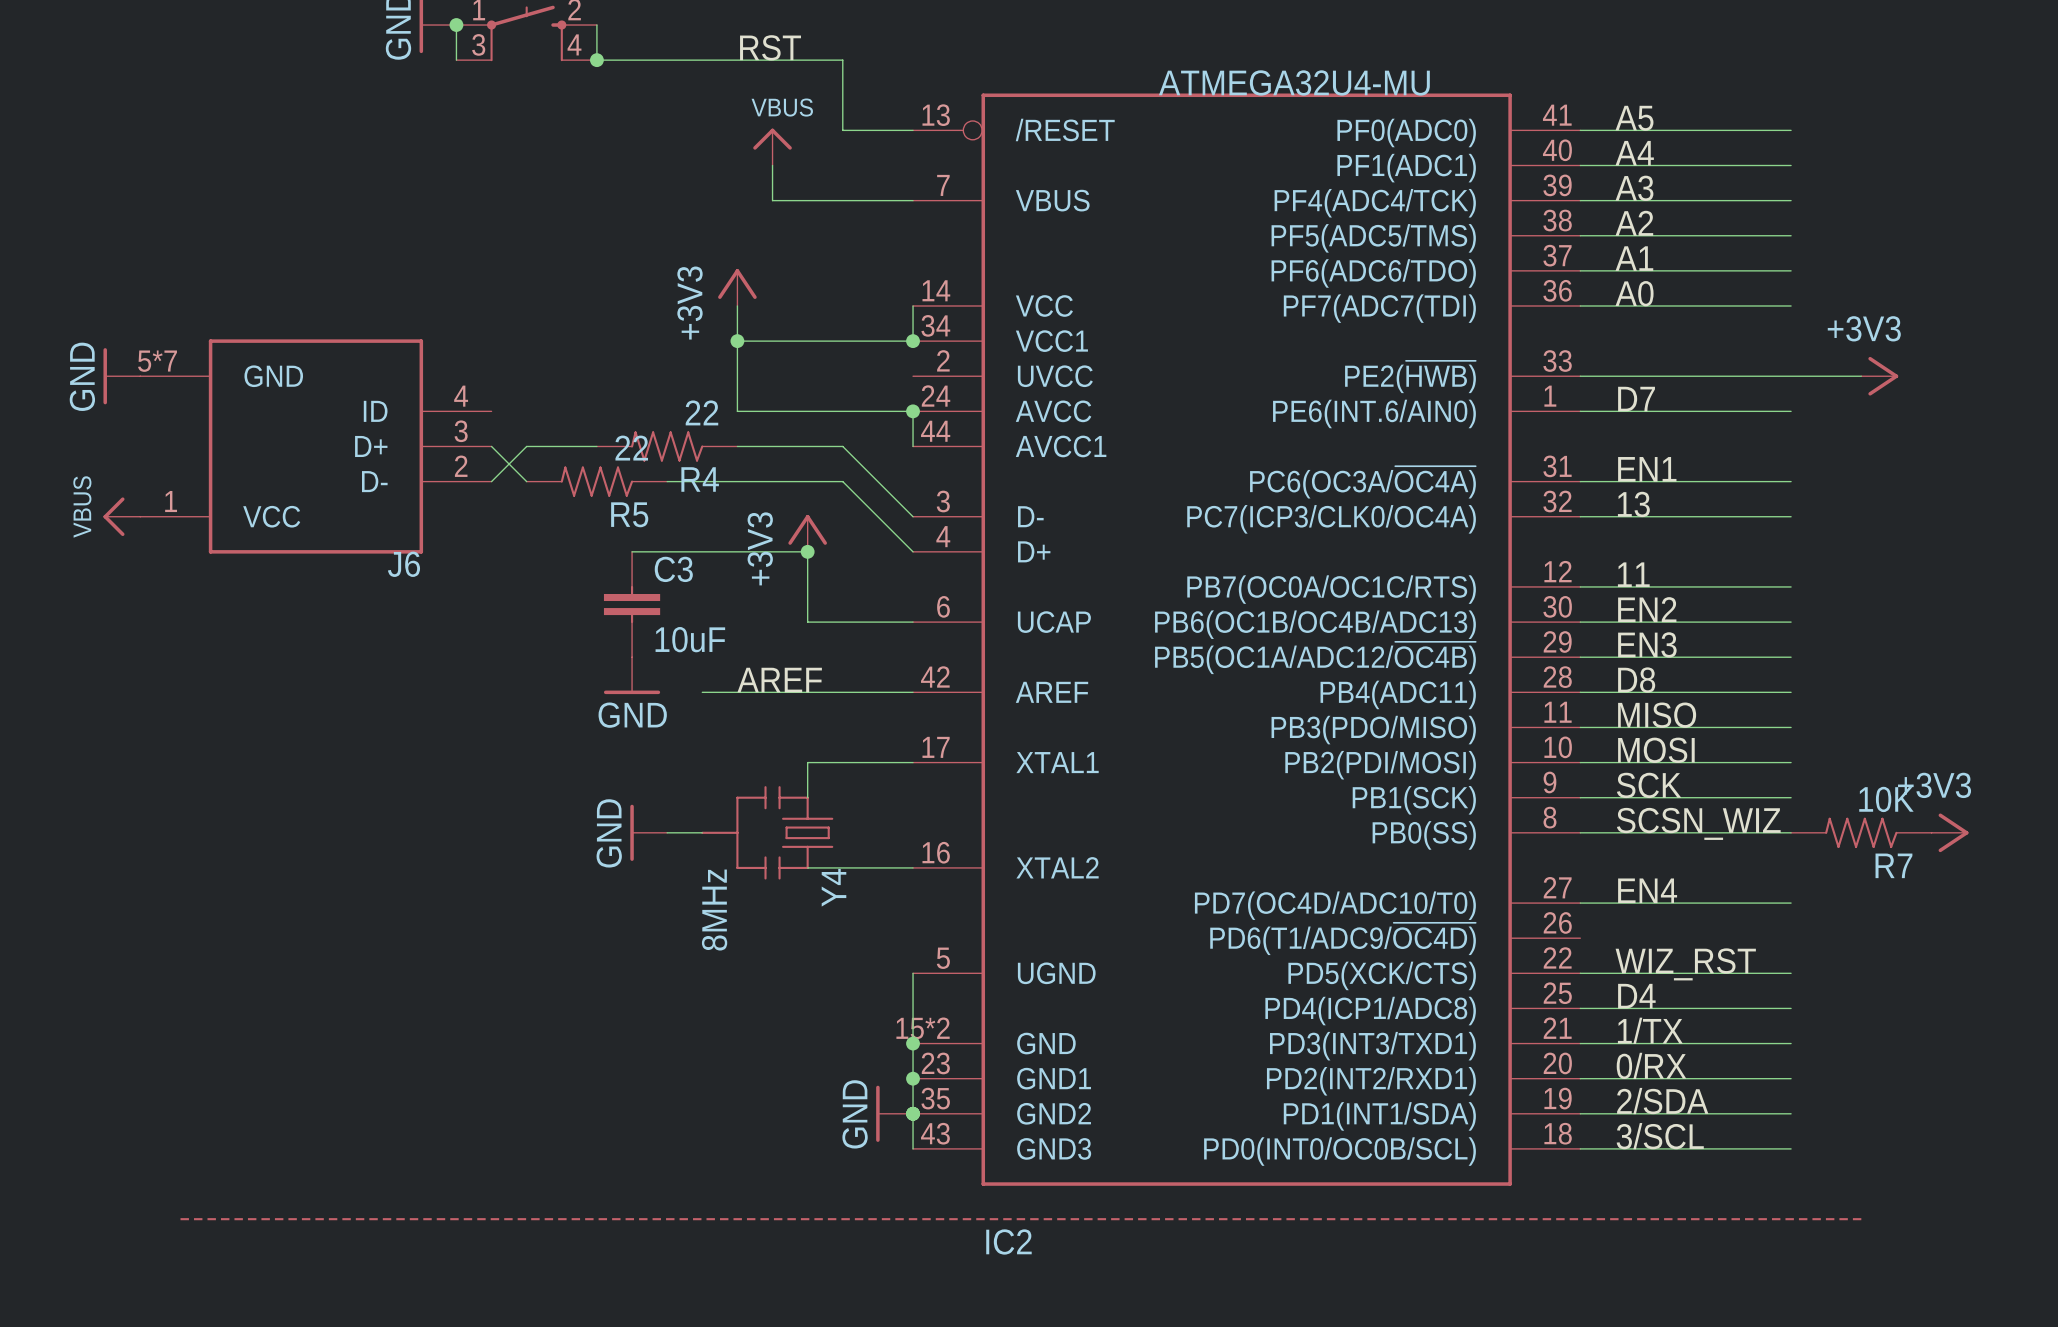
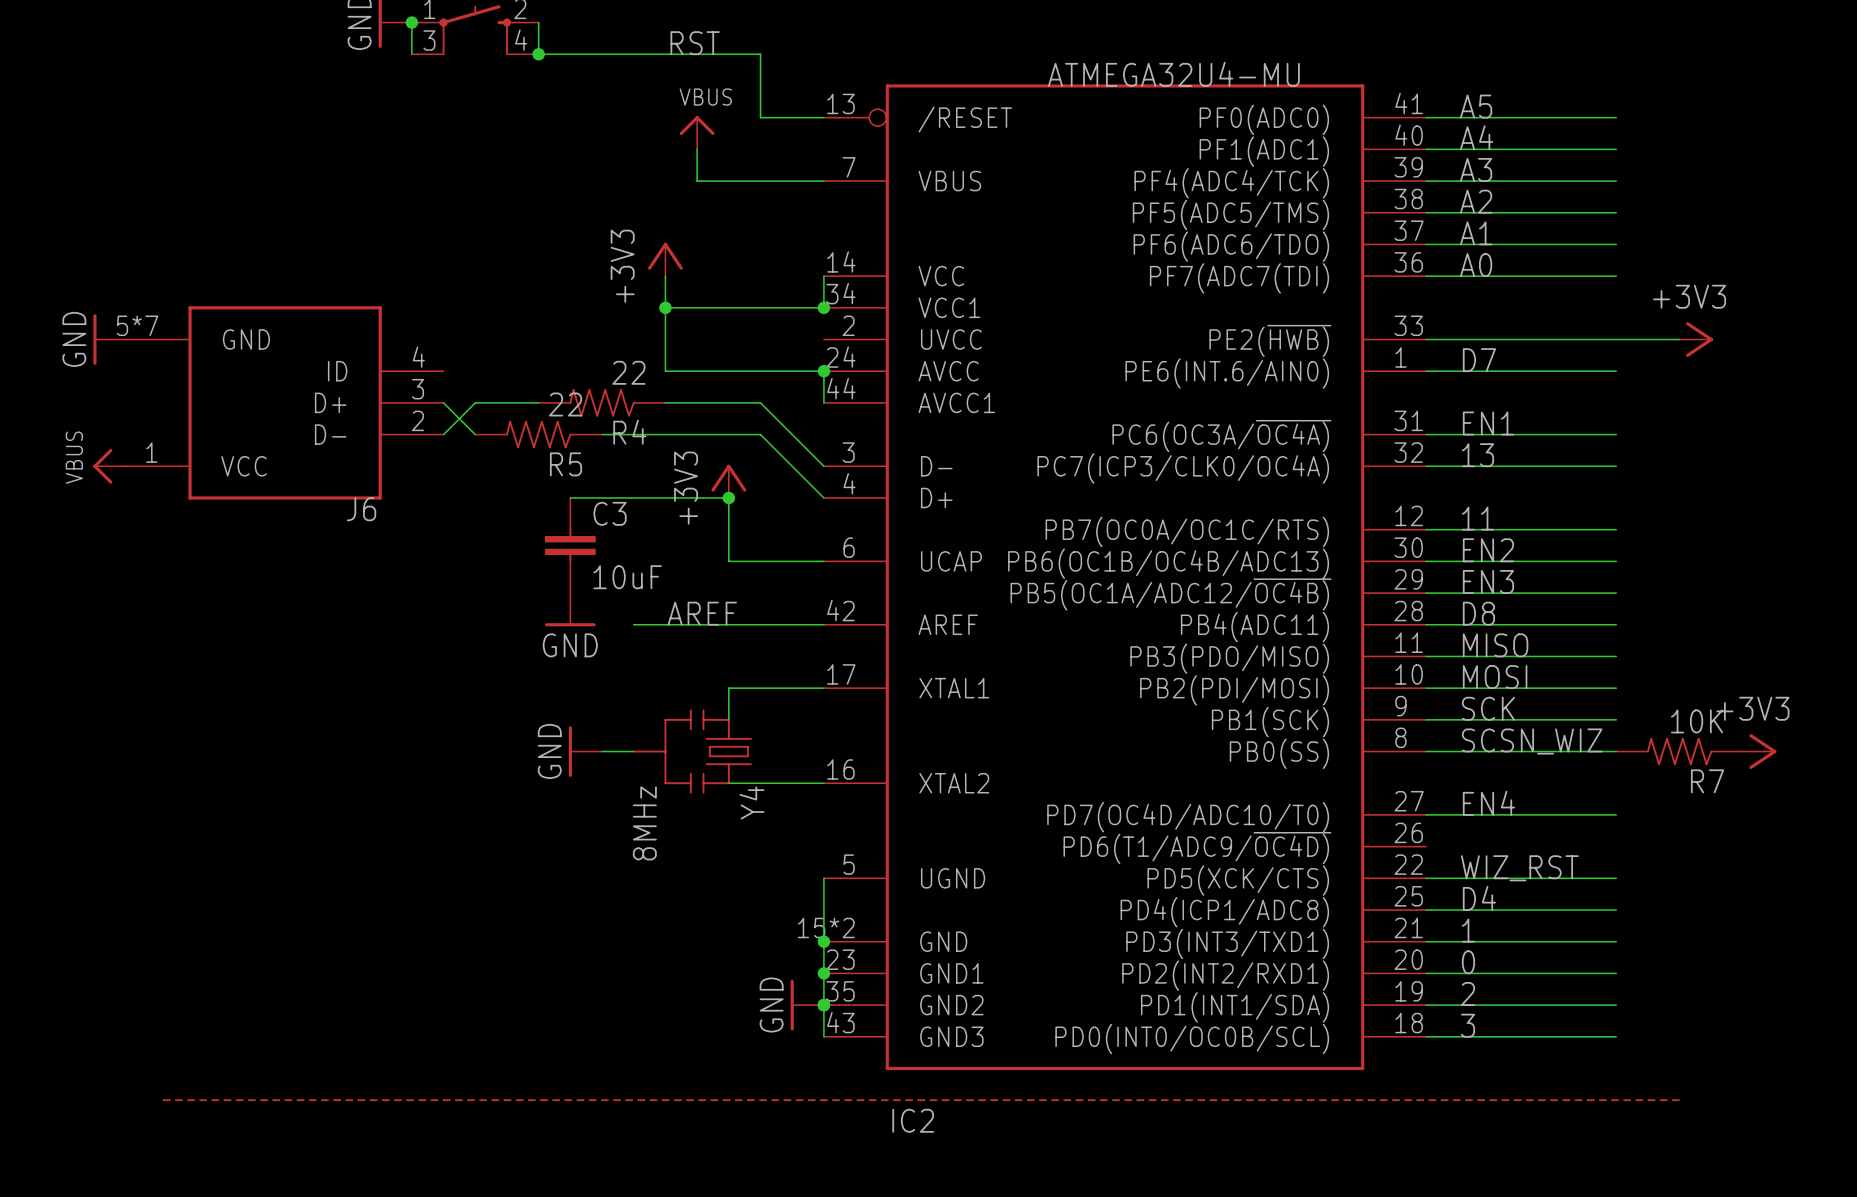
label: 1/TX (1650, 1030) -> 1 (1468, 930)
label: 0/RX (1651, 1065) -> 0 (1468, 962)
label: 2/SDA (1662, 1101) -> 2 (1468, 994)
label: 3/SCL (1660, 1136) -> 3 (1468, 1025)

